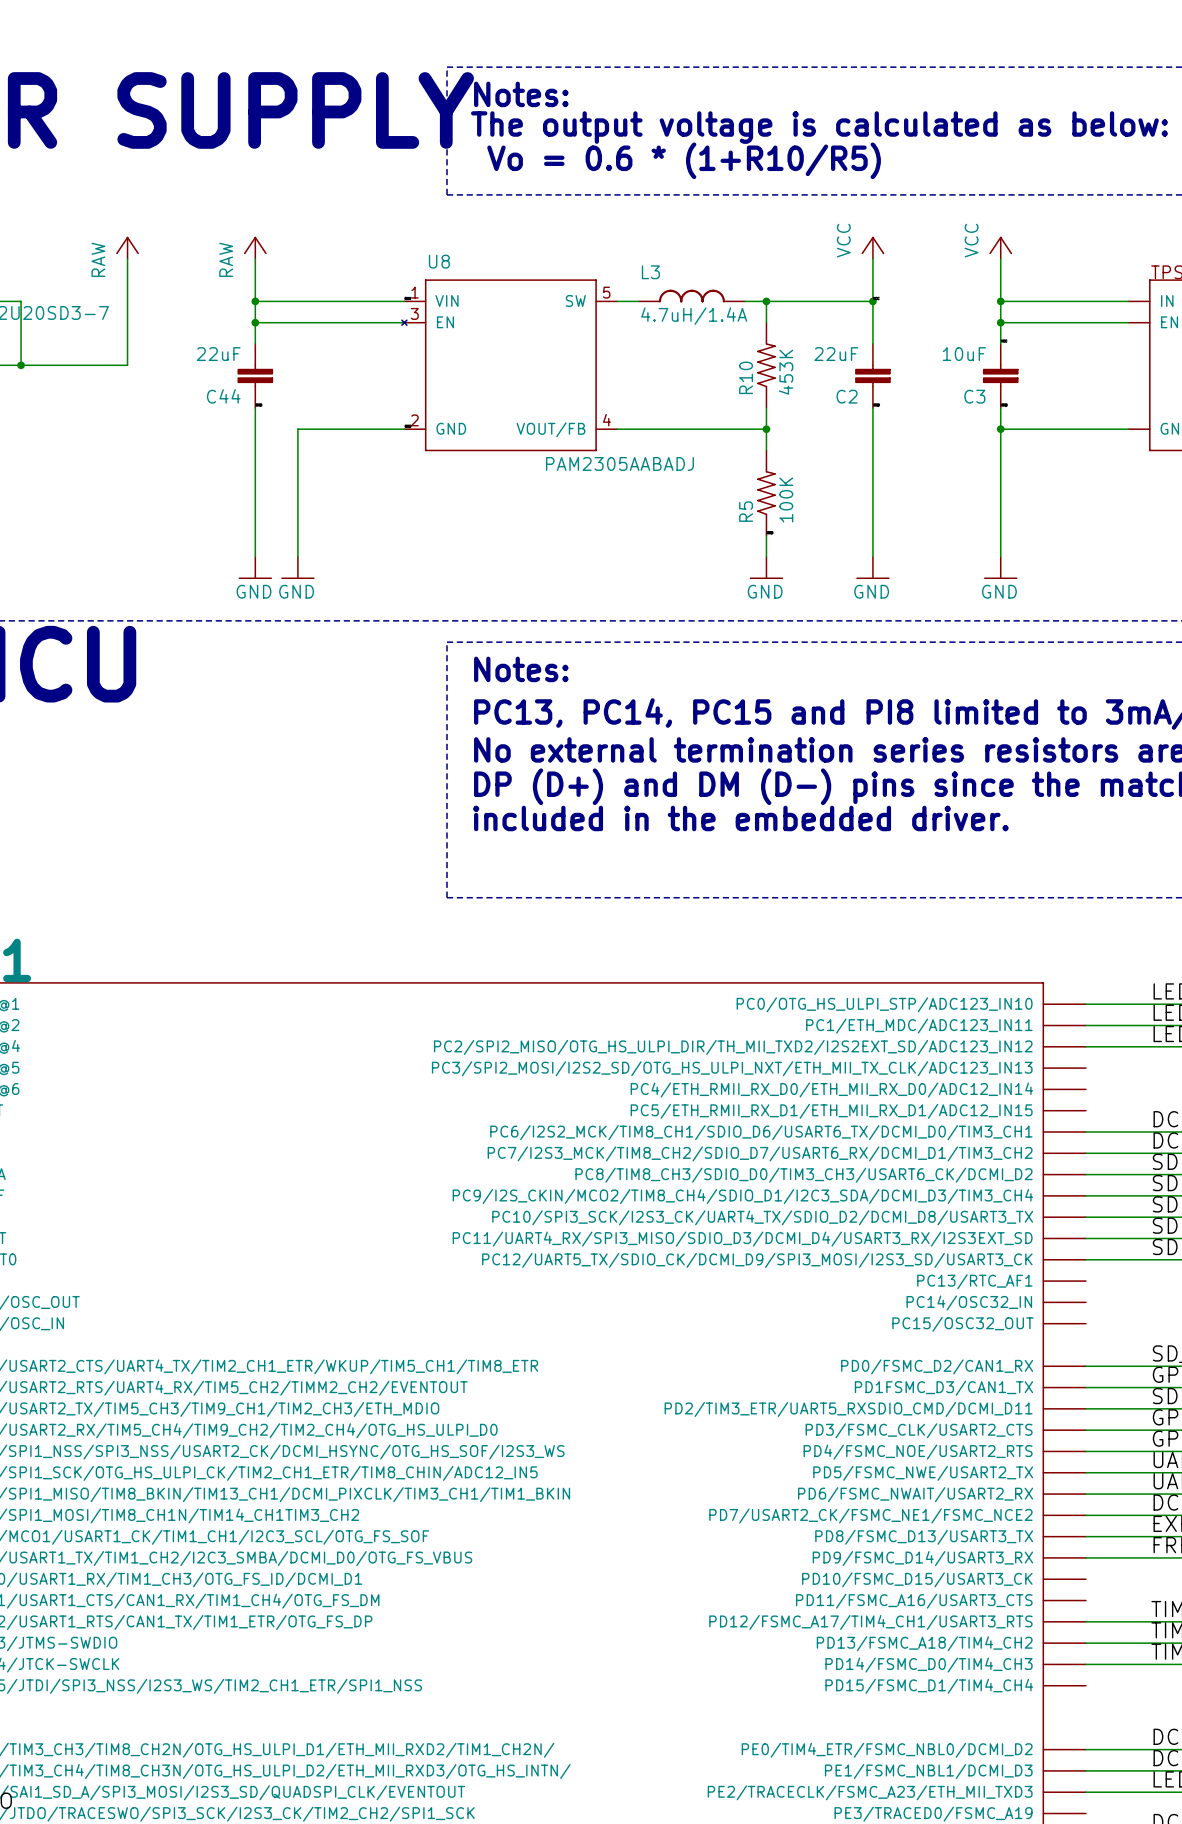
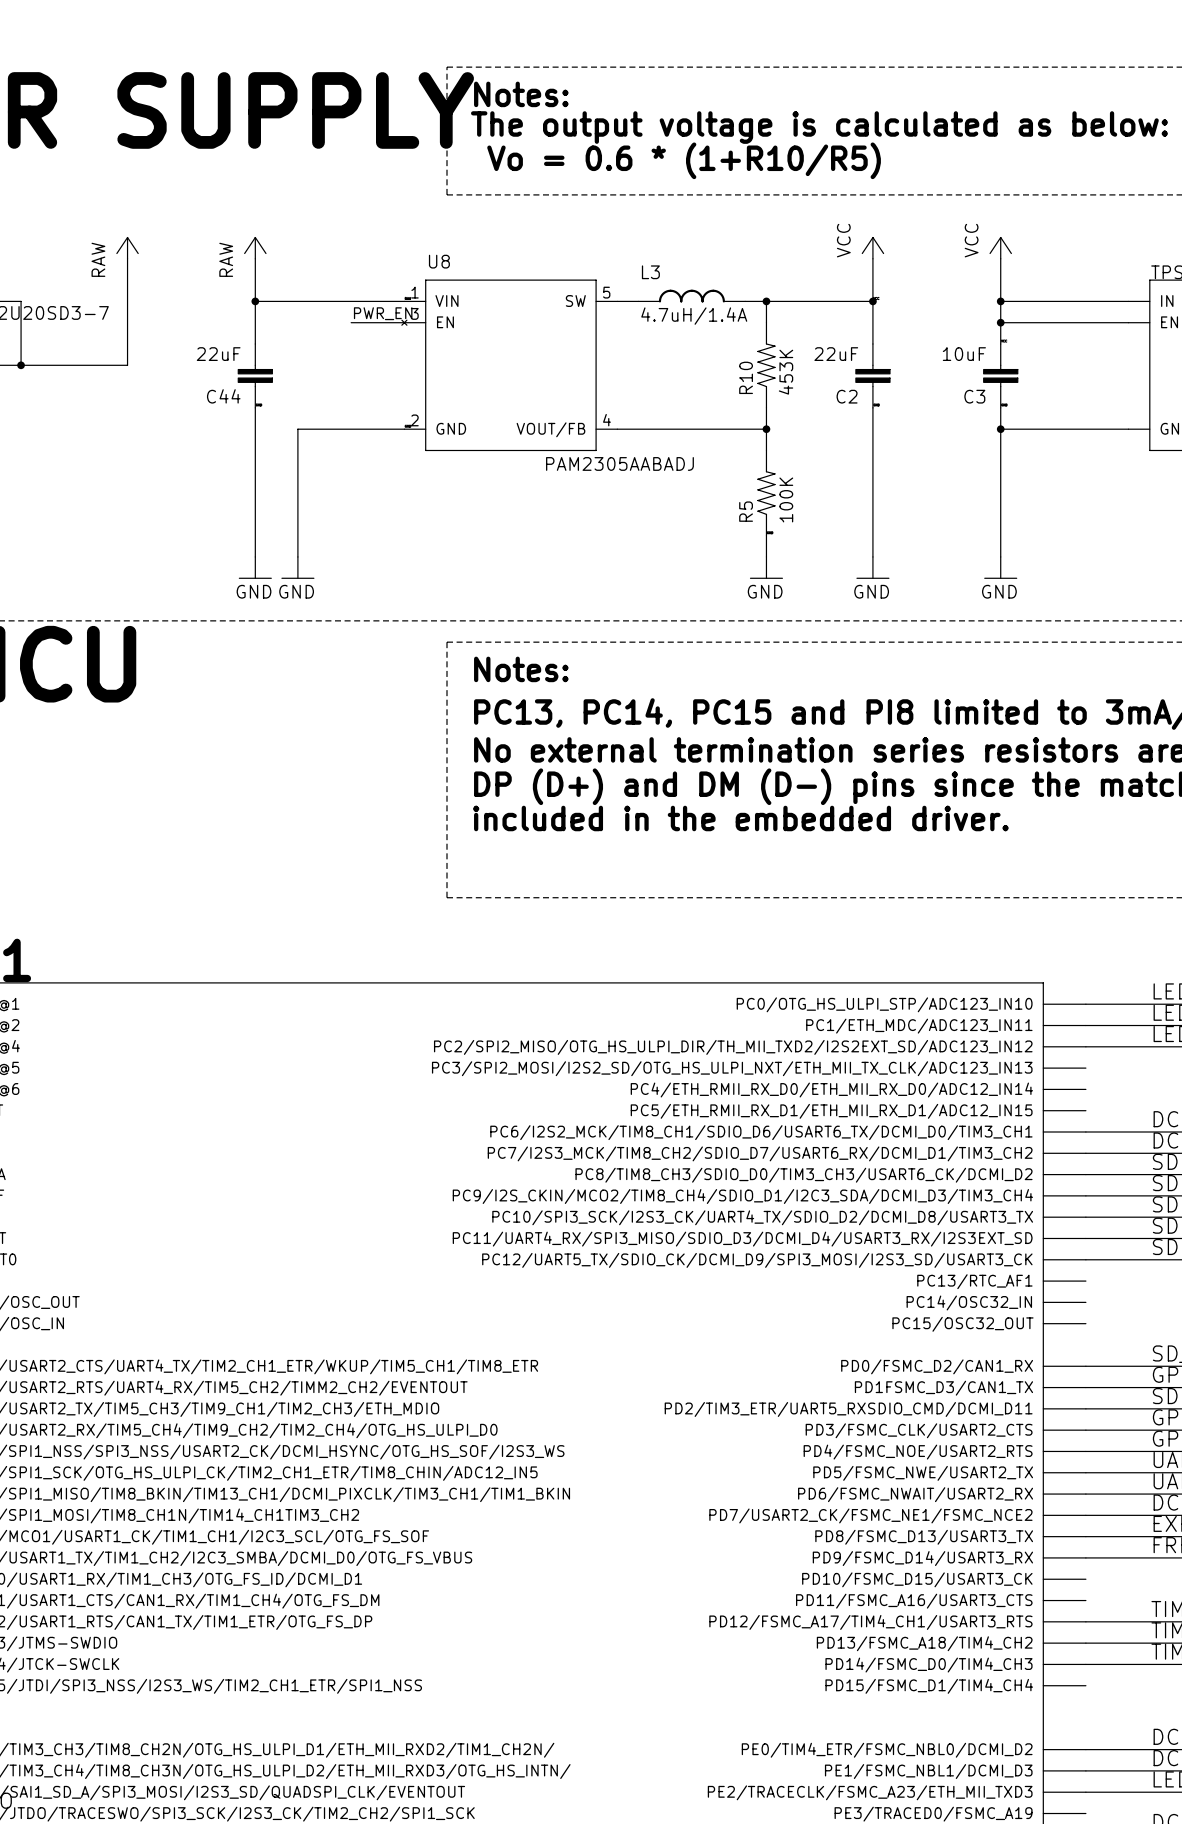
label: none -> PWR_EN (383, 313)
wire: (255, 322) (351, 322) -> none
junction: (255, 322) -> none

